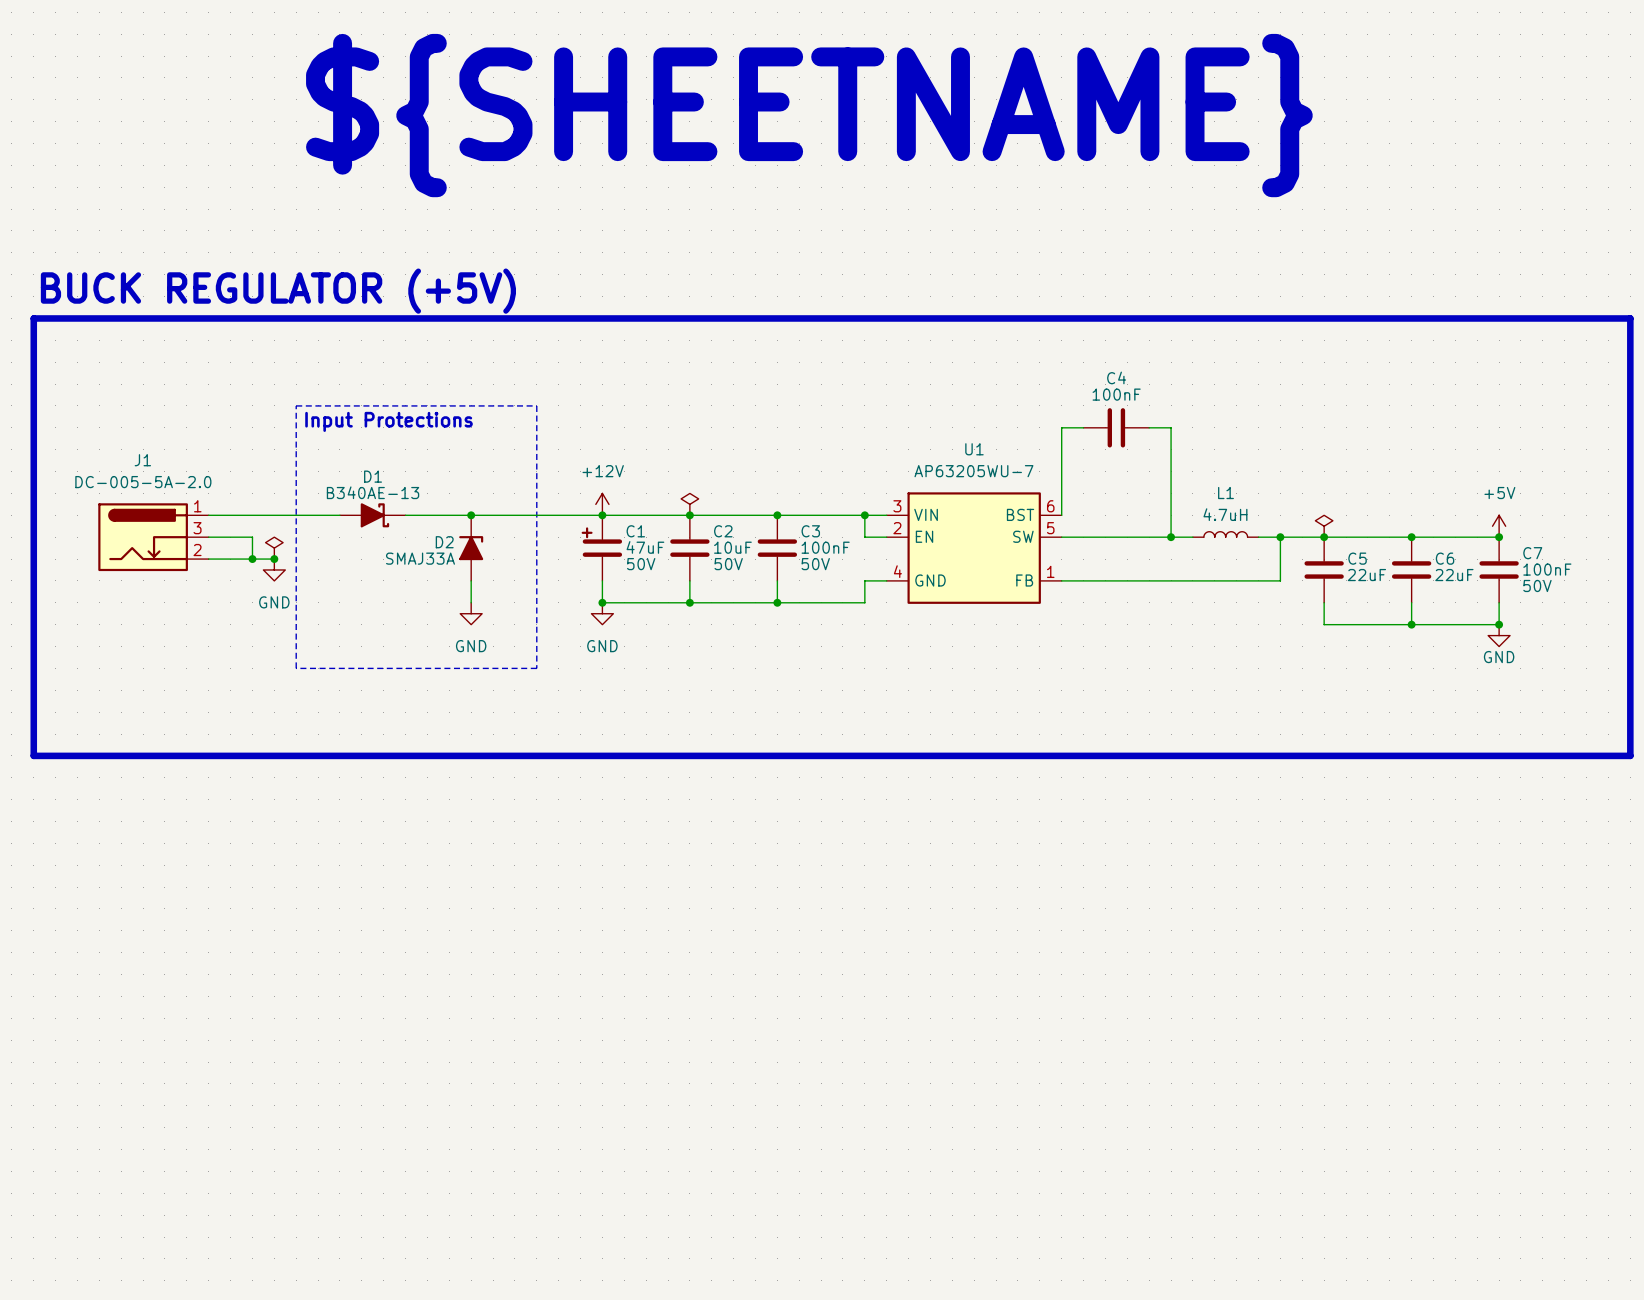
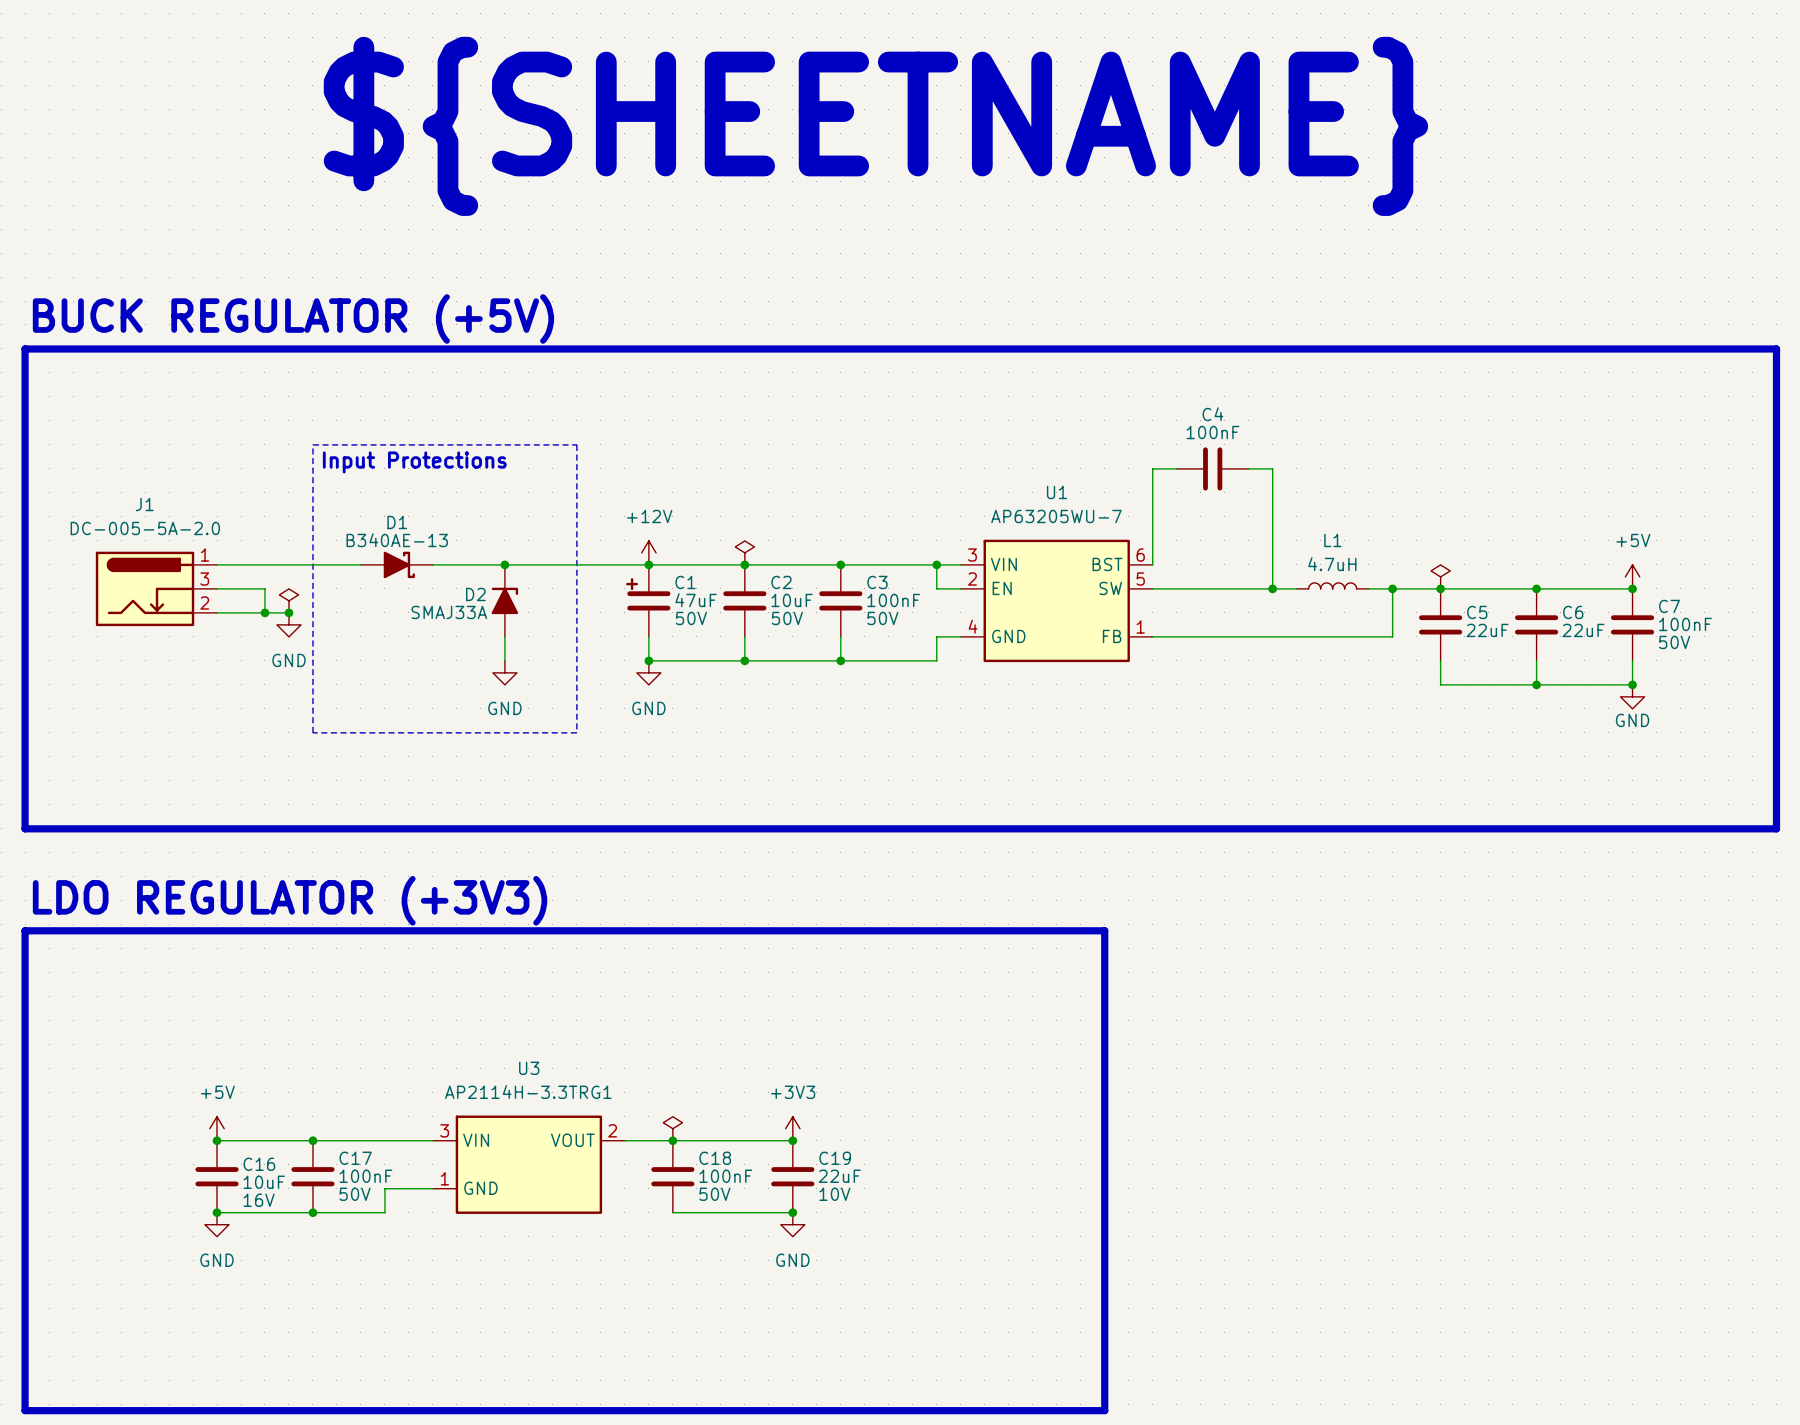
text: none -> LDO REGULATOR (+3V3) (290, 900)
line: none -> (25, 930) (1104, 930) (1104, 1410) (25, 1410) (25, 930)
power symbol: none -> +5V (217, 1128)
power symbol: none -> (672, 1128)
power symbol: none -> +3V3 (792, 1128)
wire: none -> (217, 1140) (432, 1140)
junction: none -> (217, 1140)
junction: none -> (312, 1140)
wire: none -> (624, 1140) (792, 1140)
junction: none -> (672, 1140)
junction: none -> (792, 1140)
U3: none -> AP2114H-3.3TRG1 (528, 1164)
C16: none -> 10uF (217, 1176)
C17: none -> 100nF (312, 1176)
C18: none -> 100nF (672, 1176)
C19: none -> 22uF (792, 1176)
wire: none -> (432, 1188) (384, 1188) (384, 1212) (217, 1212)
junction: none -> (217, 1212)
junction: none -> (312, 1212)
wire: none -> (672, 1212) (792, 1212)
junction: none -> (792, 1212)
power symbol: none -> GND (217, 1224)
power symbol: none -> GND (792, 1224)

